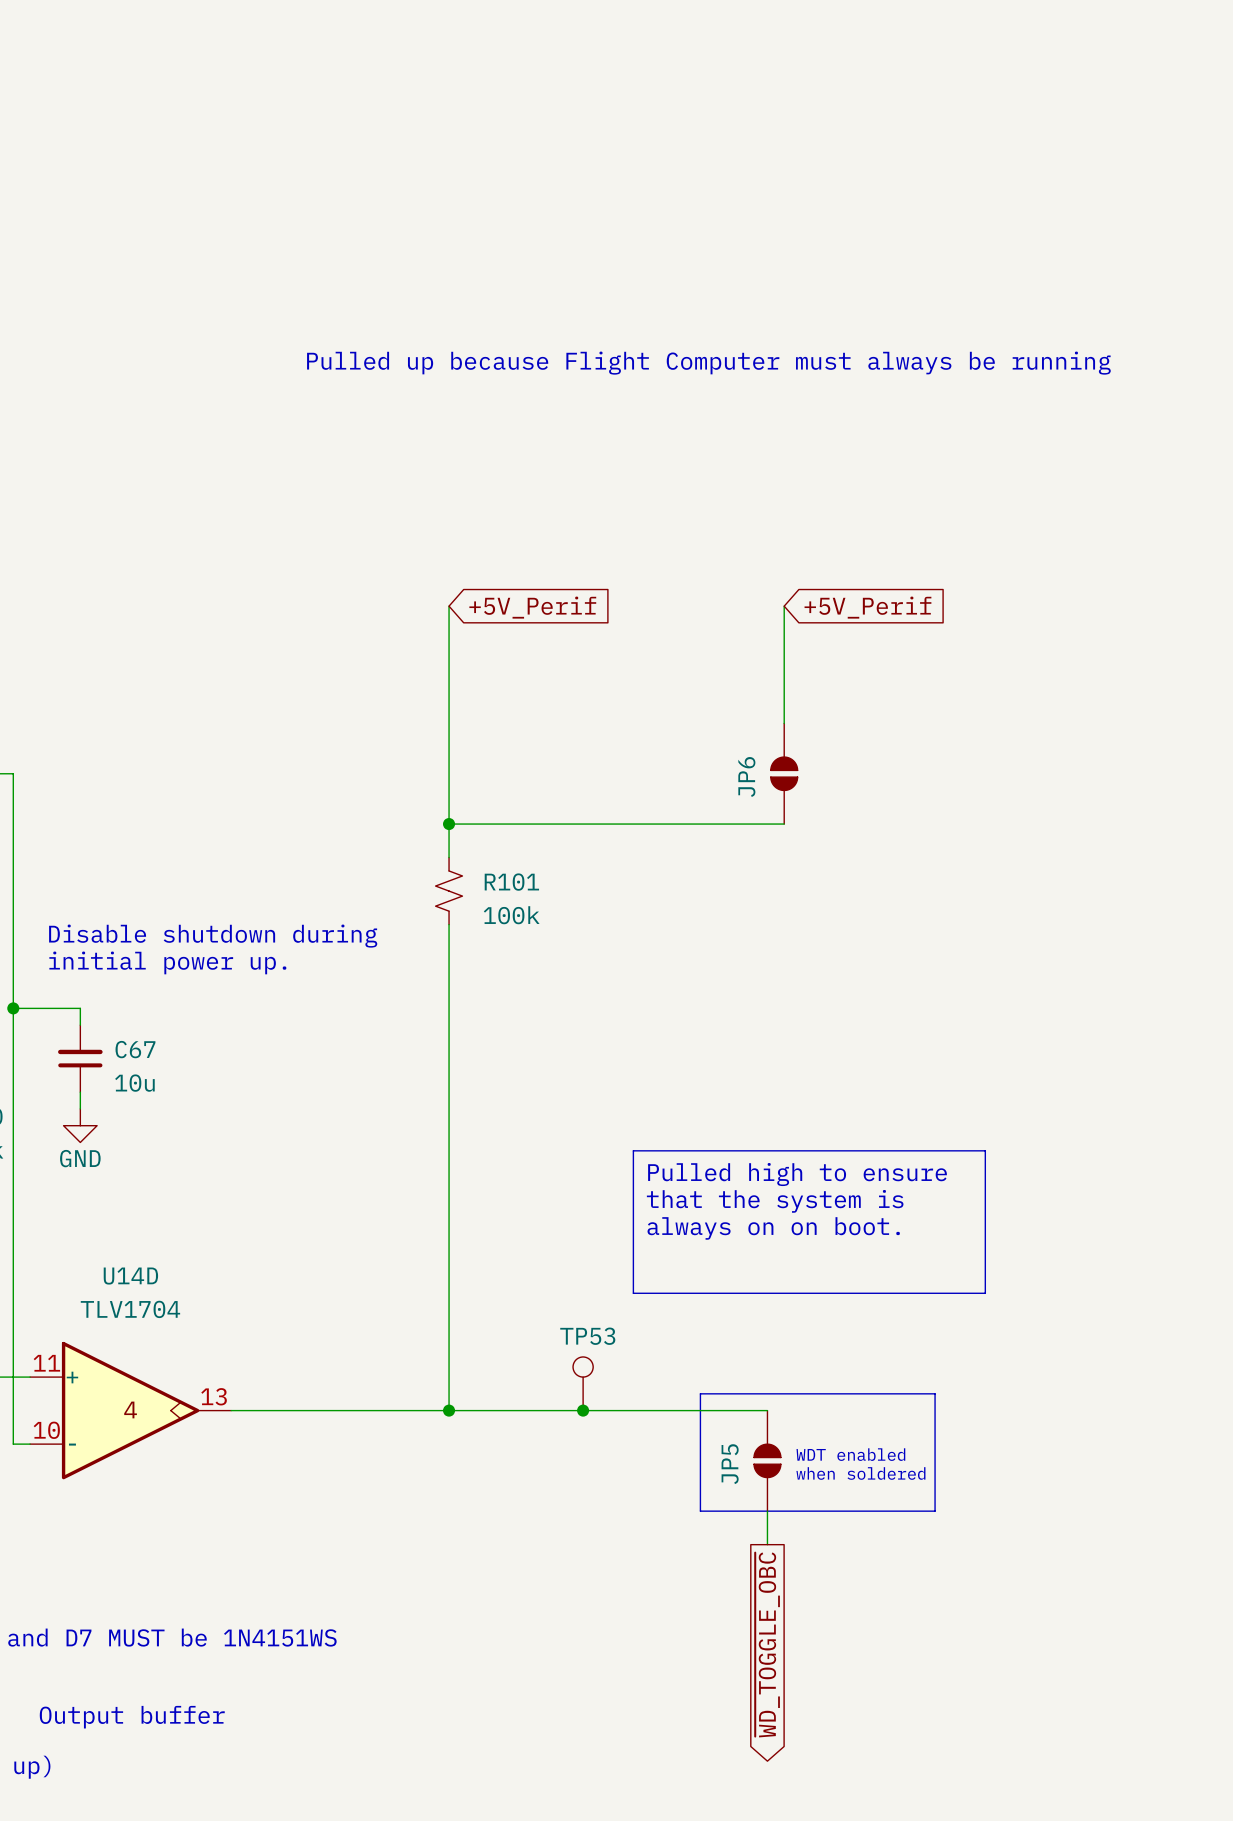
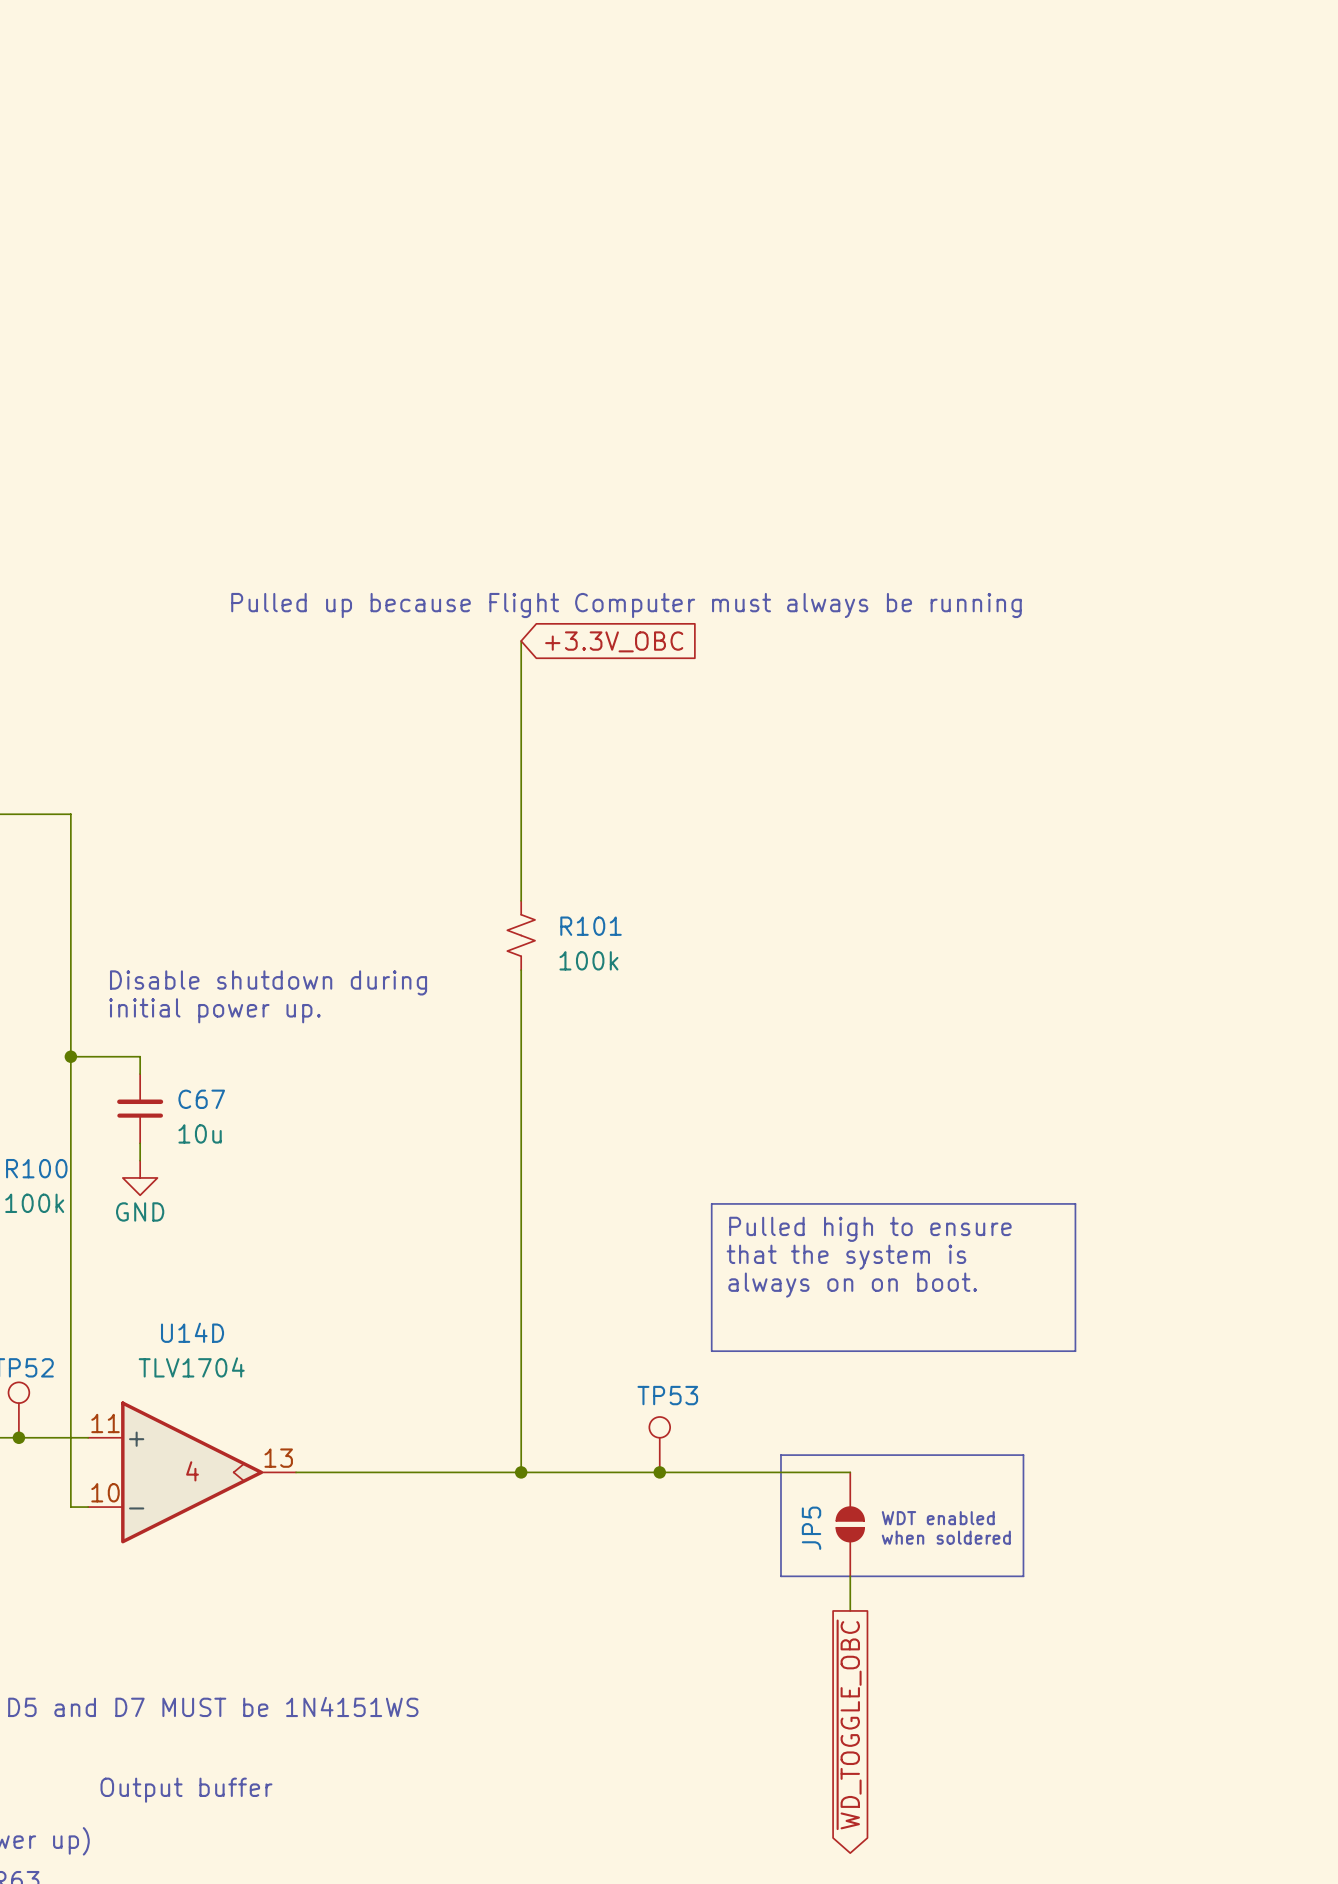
text position: Pulled up because Flight Computer must always be running (708, 363) -> Pulled up because Flight Computer must always be running (626, 605)
wire: (784, 606) (784, 723) -> none
global label: +5V_Perif (532, 607) -> +3.3V_OBC (614, 641)
global label: +5V_Perif (867, 607) -> none
JP6: (784, 773) -> none
wire: (449, 824) (784, 824) -> none
junction: (449, 824) -> none

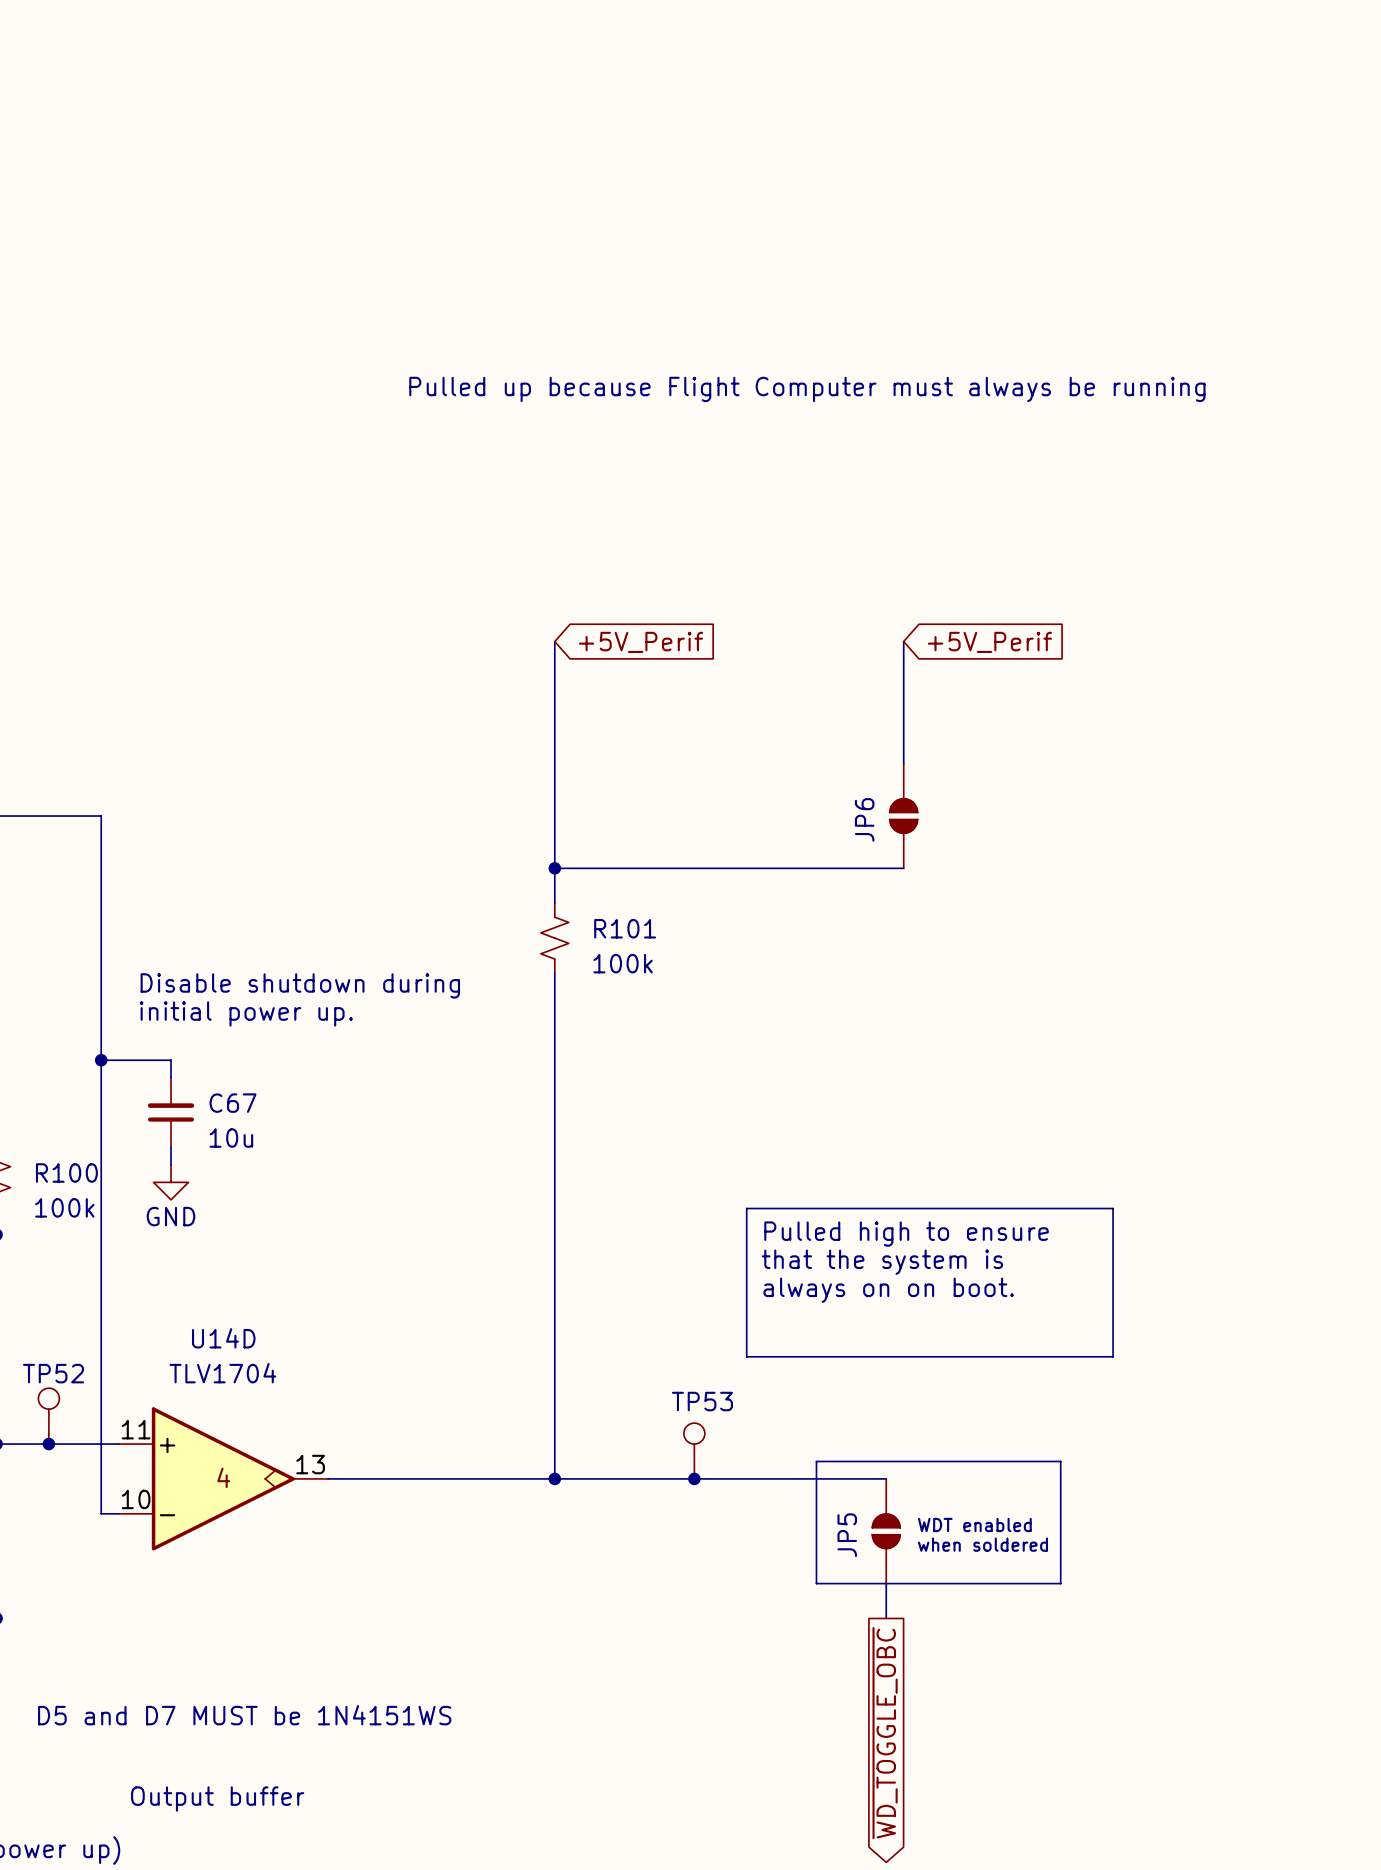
text position: Pulled up because Flight Computer must always be running (626, 605) -> Pulled up because Flight Computer must always be running (807, 389)
global label: +3.3V_OBC (614, 641) -> +5V_Perif (641, 642)
wire: none -> (903, 641) (903, 763)
global label: none -> +5V_Perif (989, 642)
JP6: none -> (903, 816)
wire: none -> (554, 868) (903, 868)
junction: none -> (554, 868)

